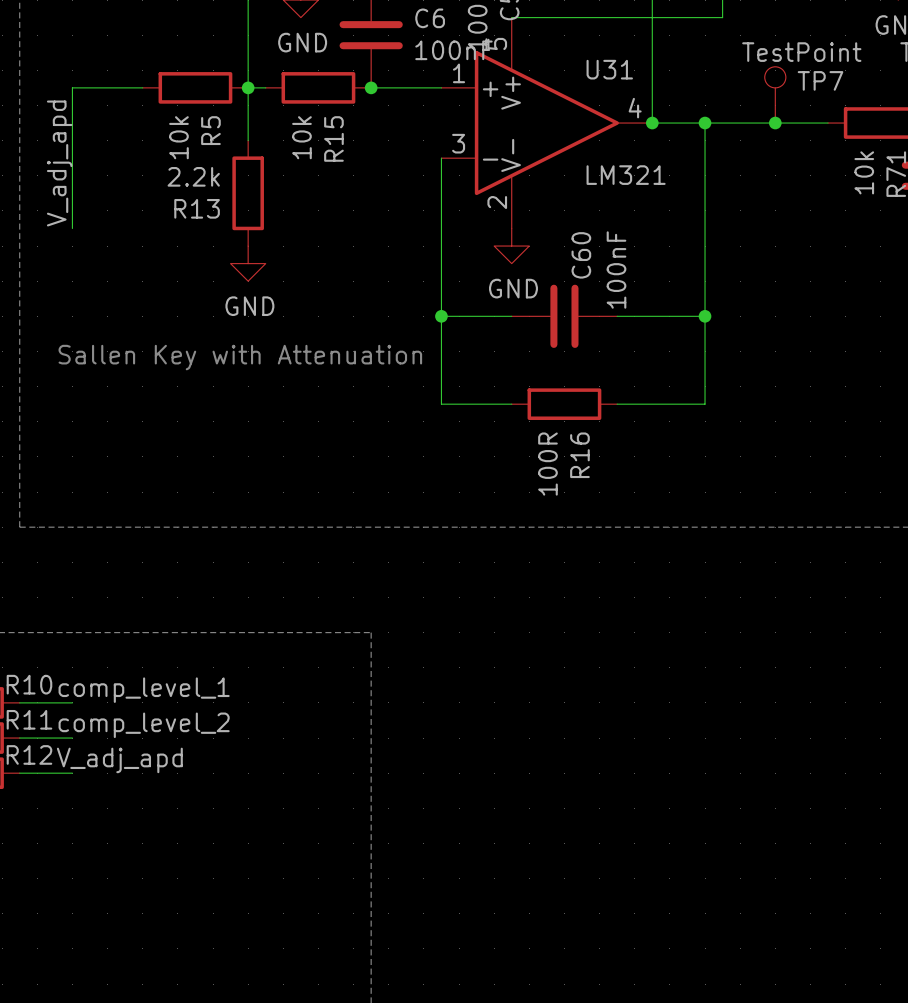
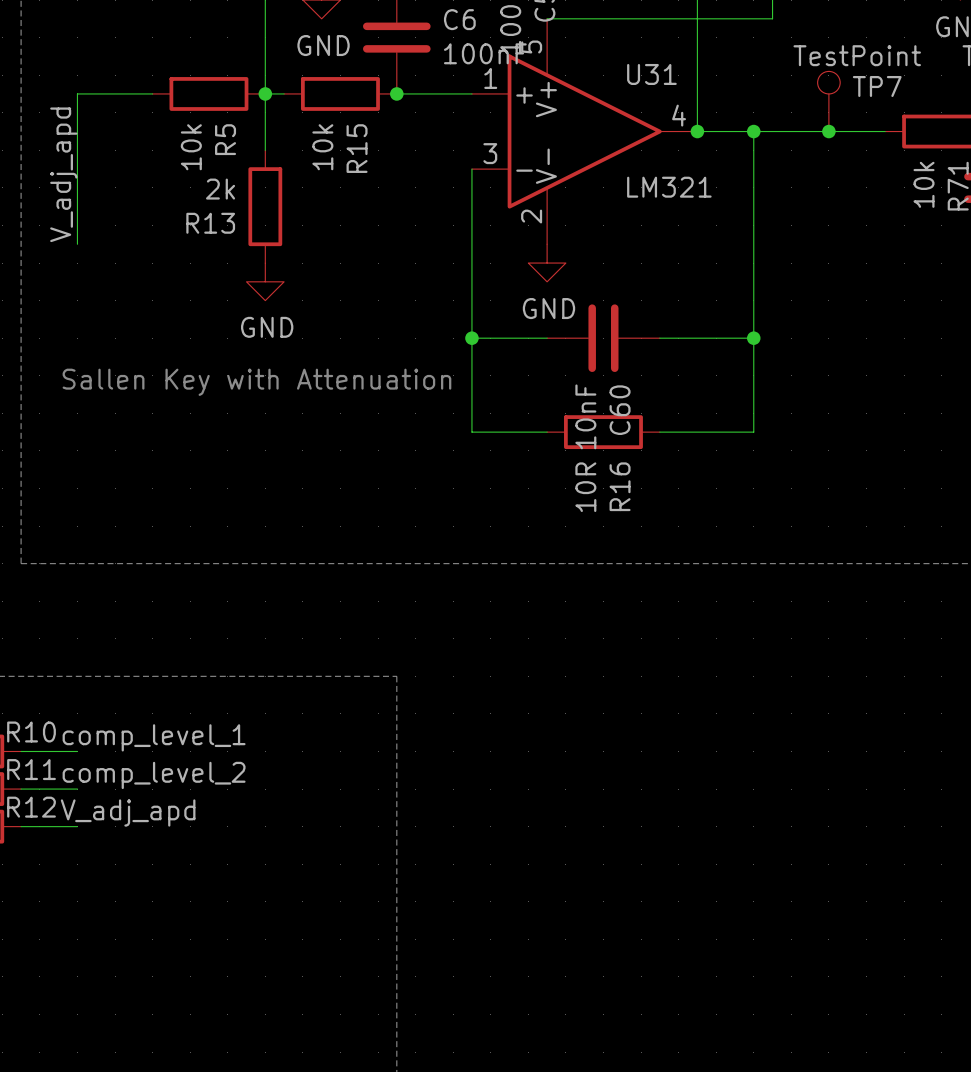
R13 value: 2.2k (193, 176) -> 2k (220, 189)
C60 name position: C60 (581, 255) -> C60 (620, 410)
C60 value: 100nF (616, 270) -> 10nF (585, 416)
R16 value: 100R (547, 464) -> 10R (585, 487)

